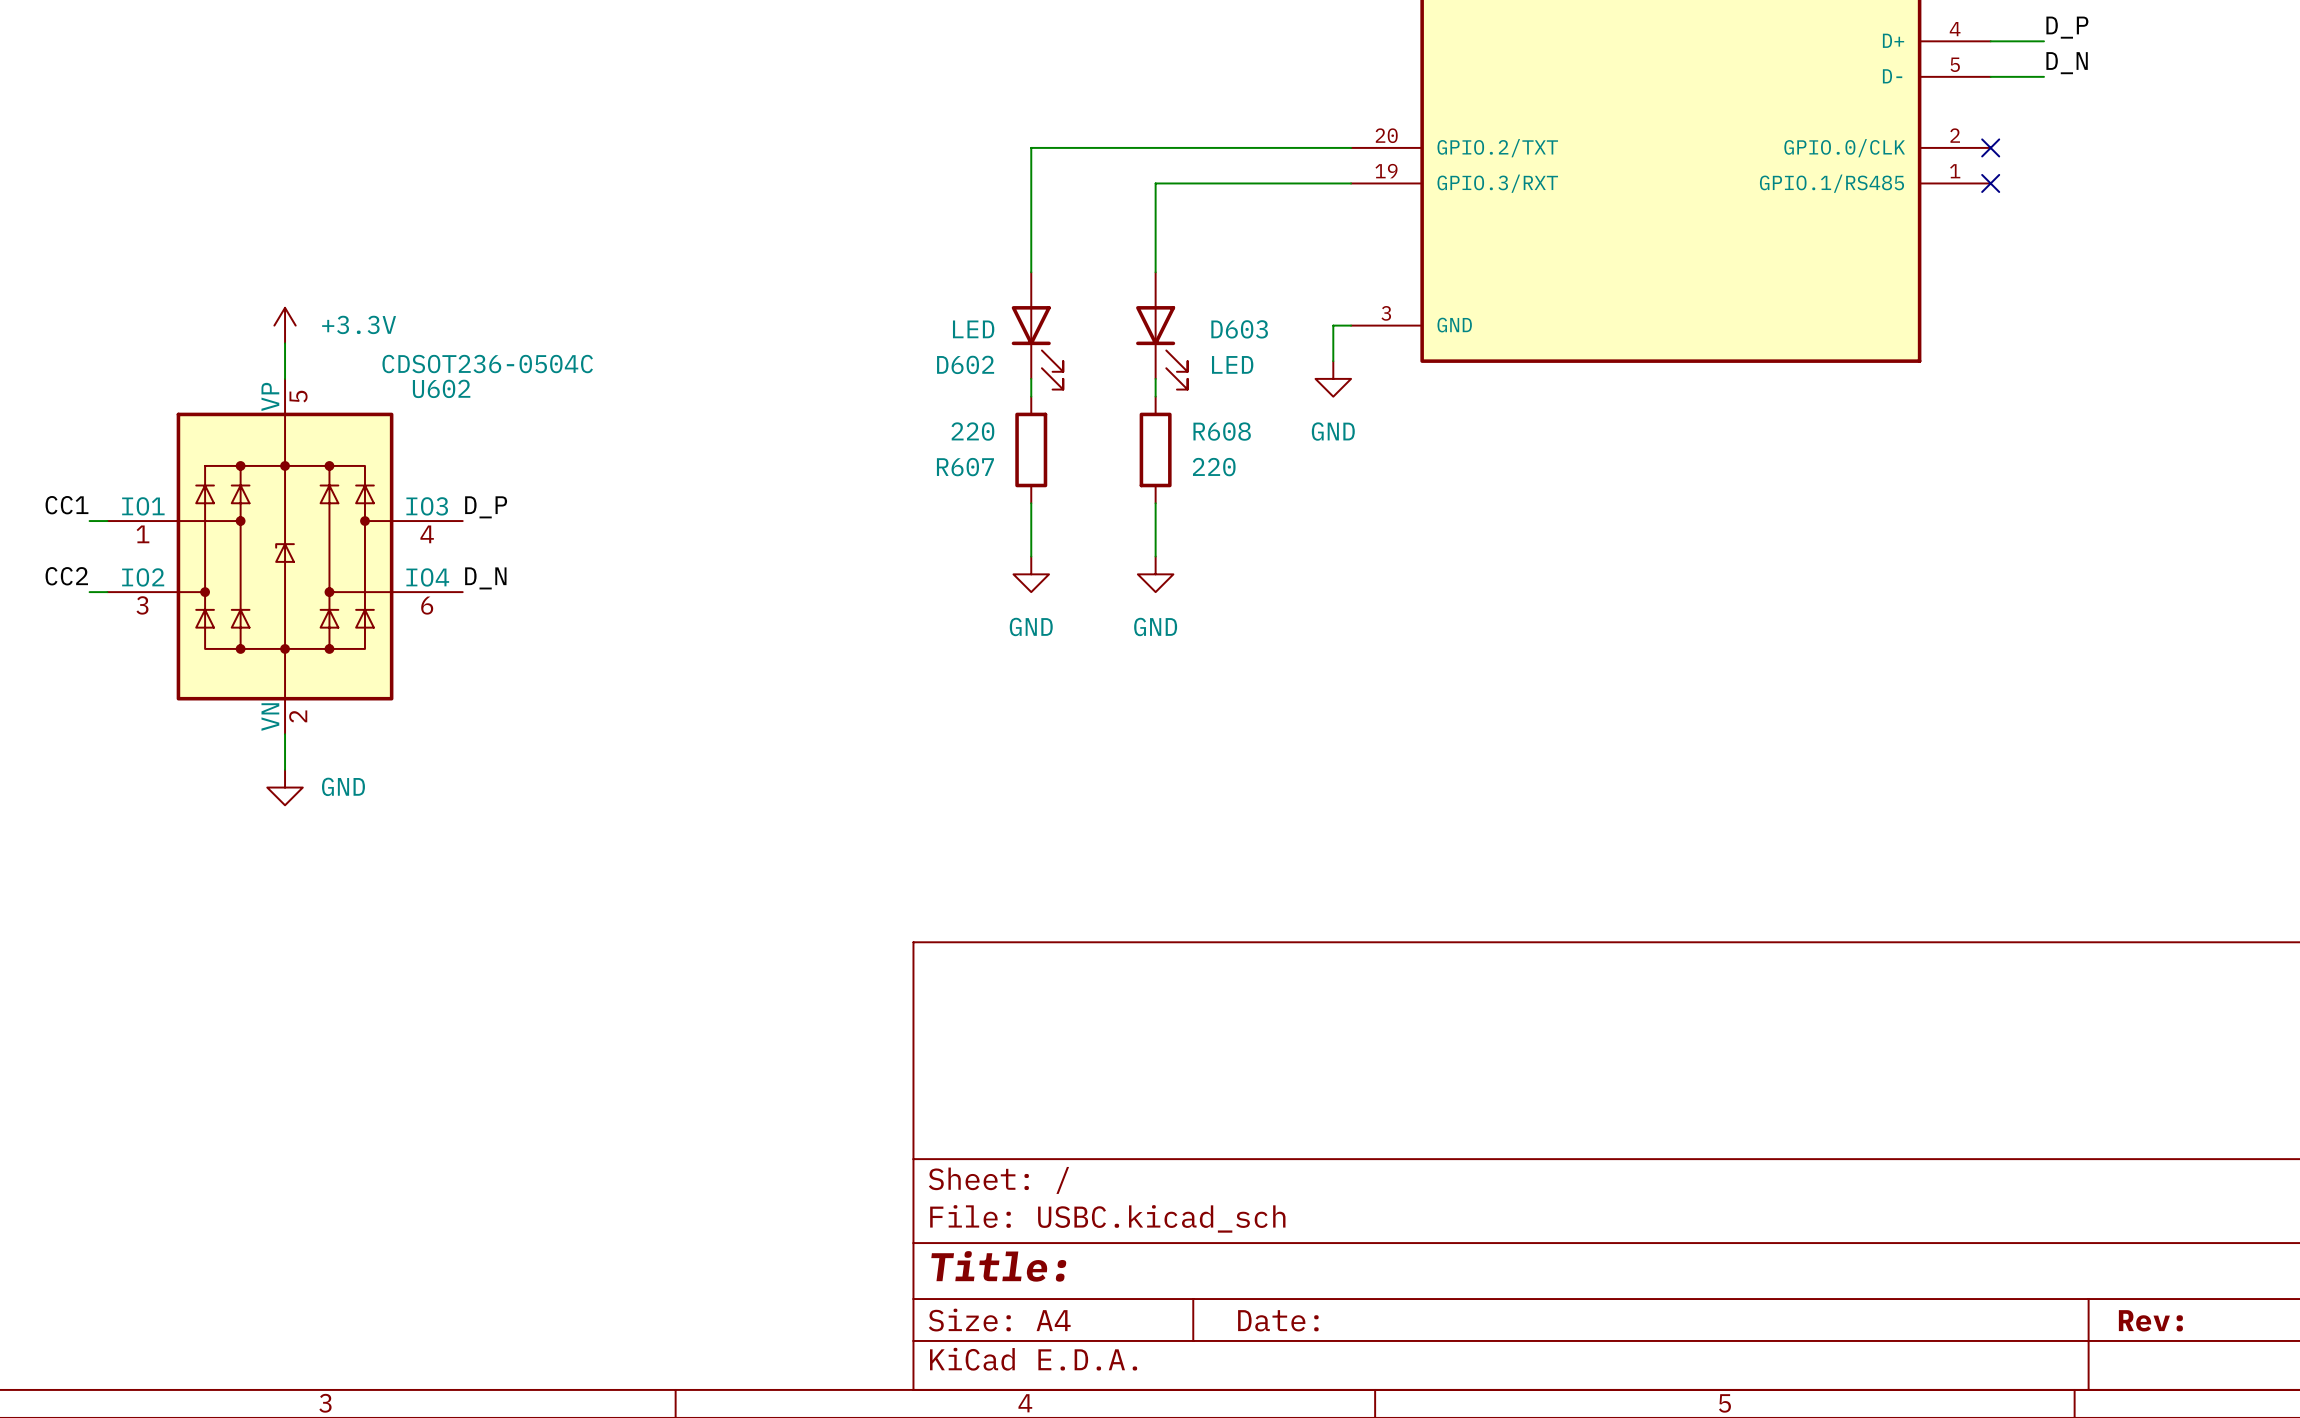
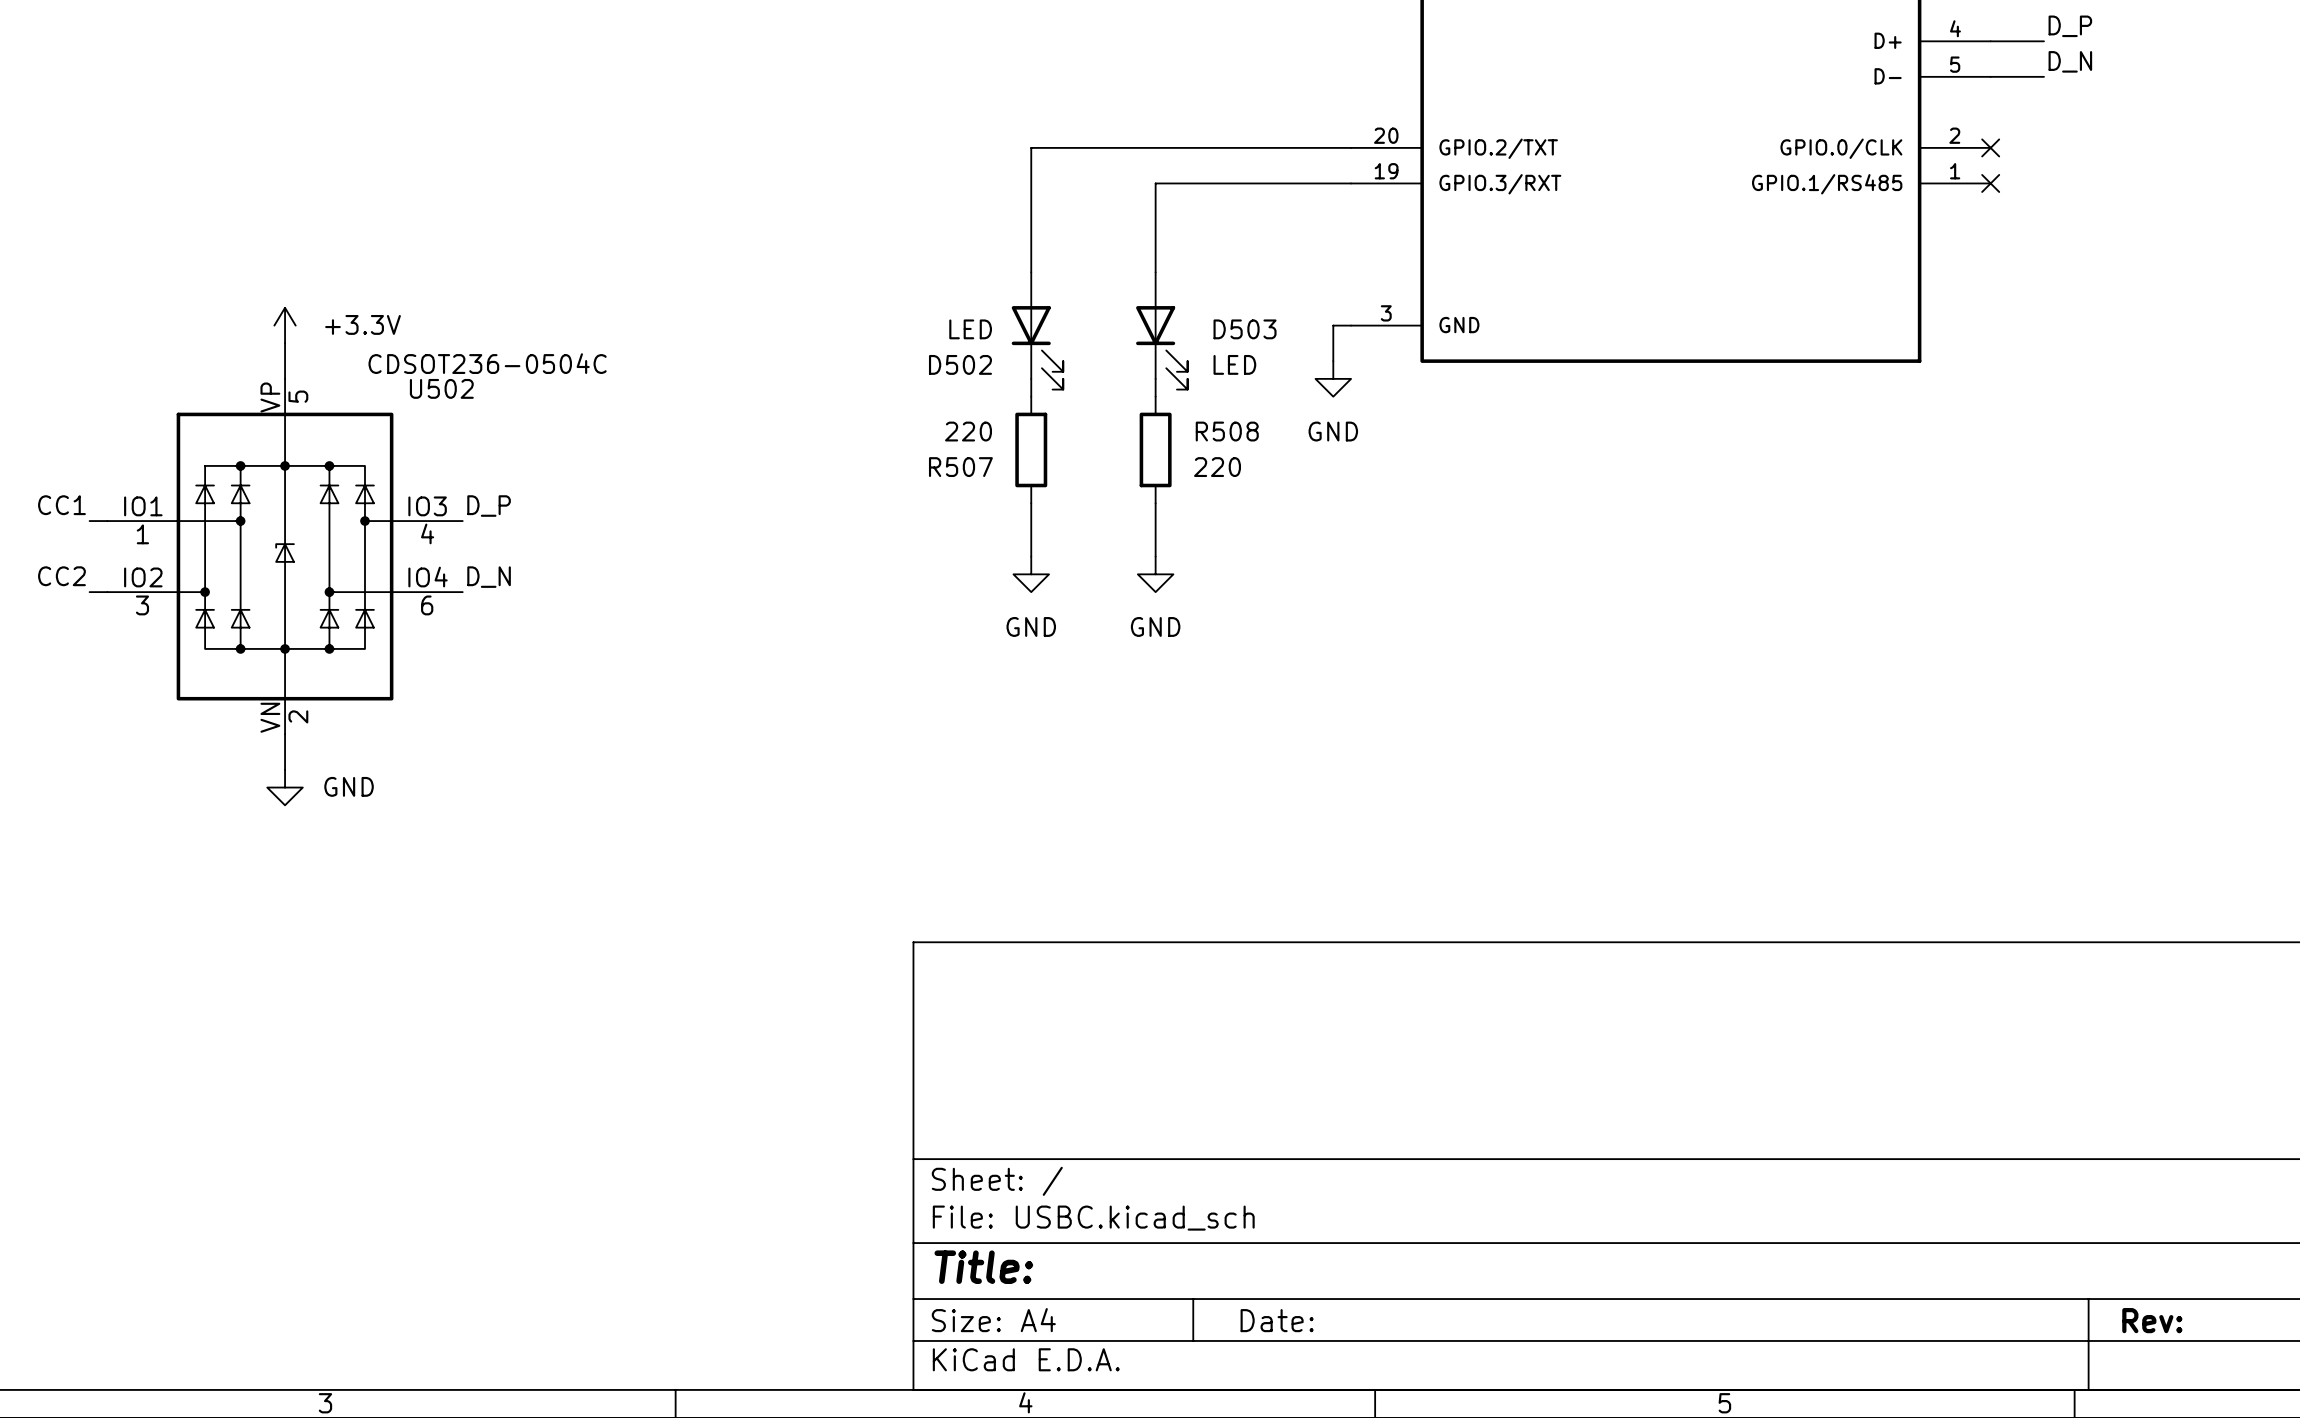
D603 name: D603 (1239, 329) -> D503 (1245, 329)
D602 name: D602 (965, 364) -> D502 (960, 364)
U602 name: U602 (441, 388) -> U502 (441, 388)
R608 name: R608 (1222, 431) -> R508 (1227, 431)
R607 name: R607 (965, 467) -> R507 (960, 467)

